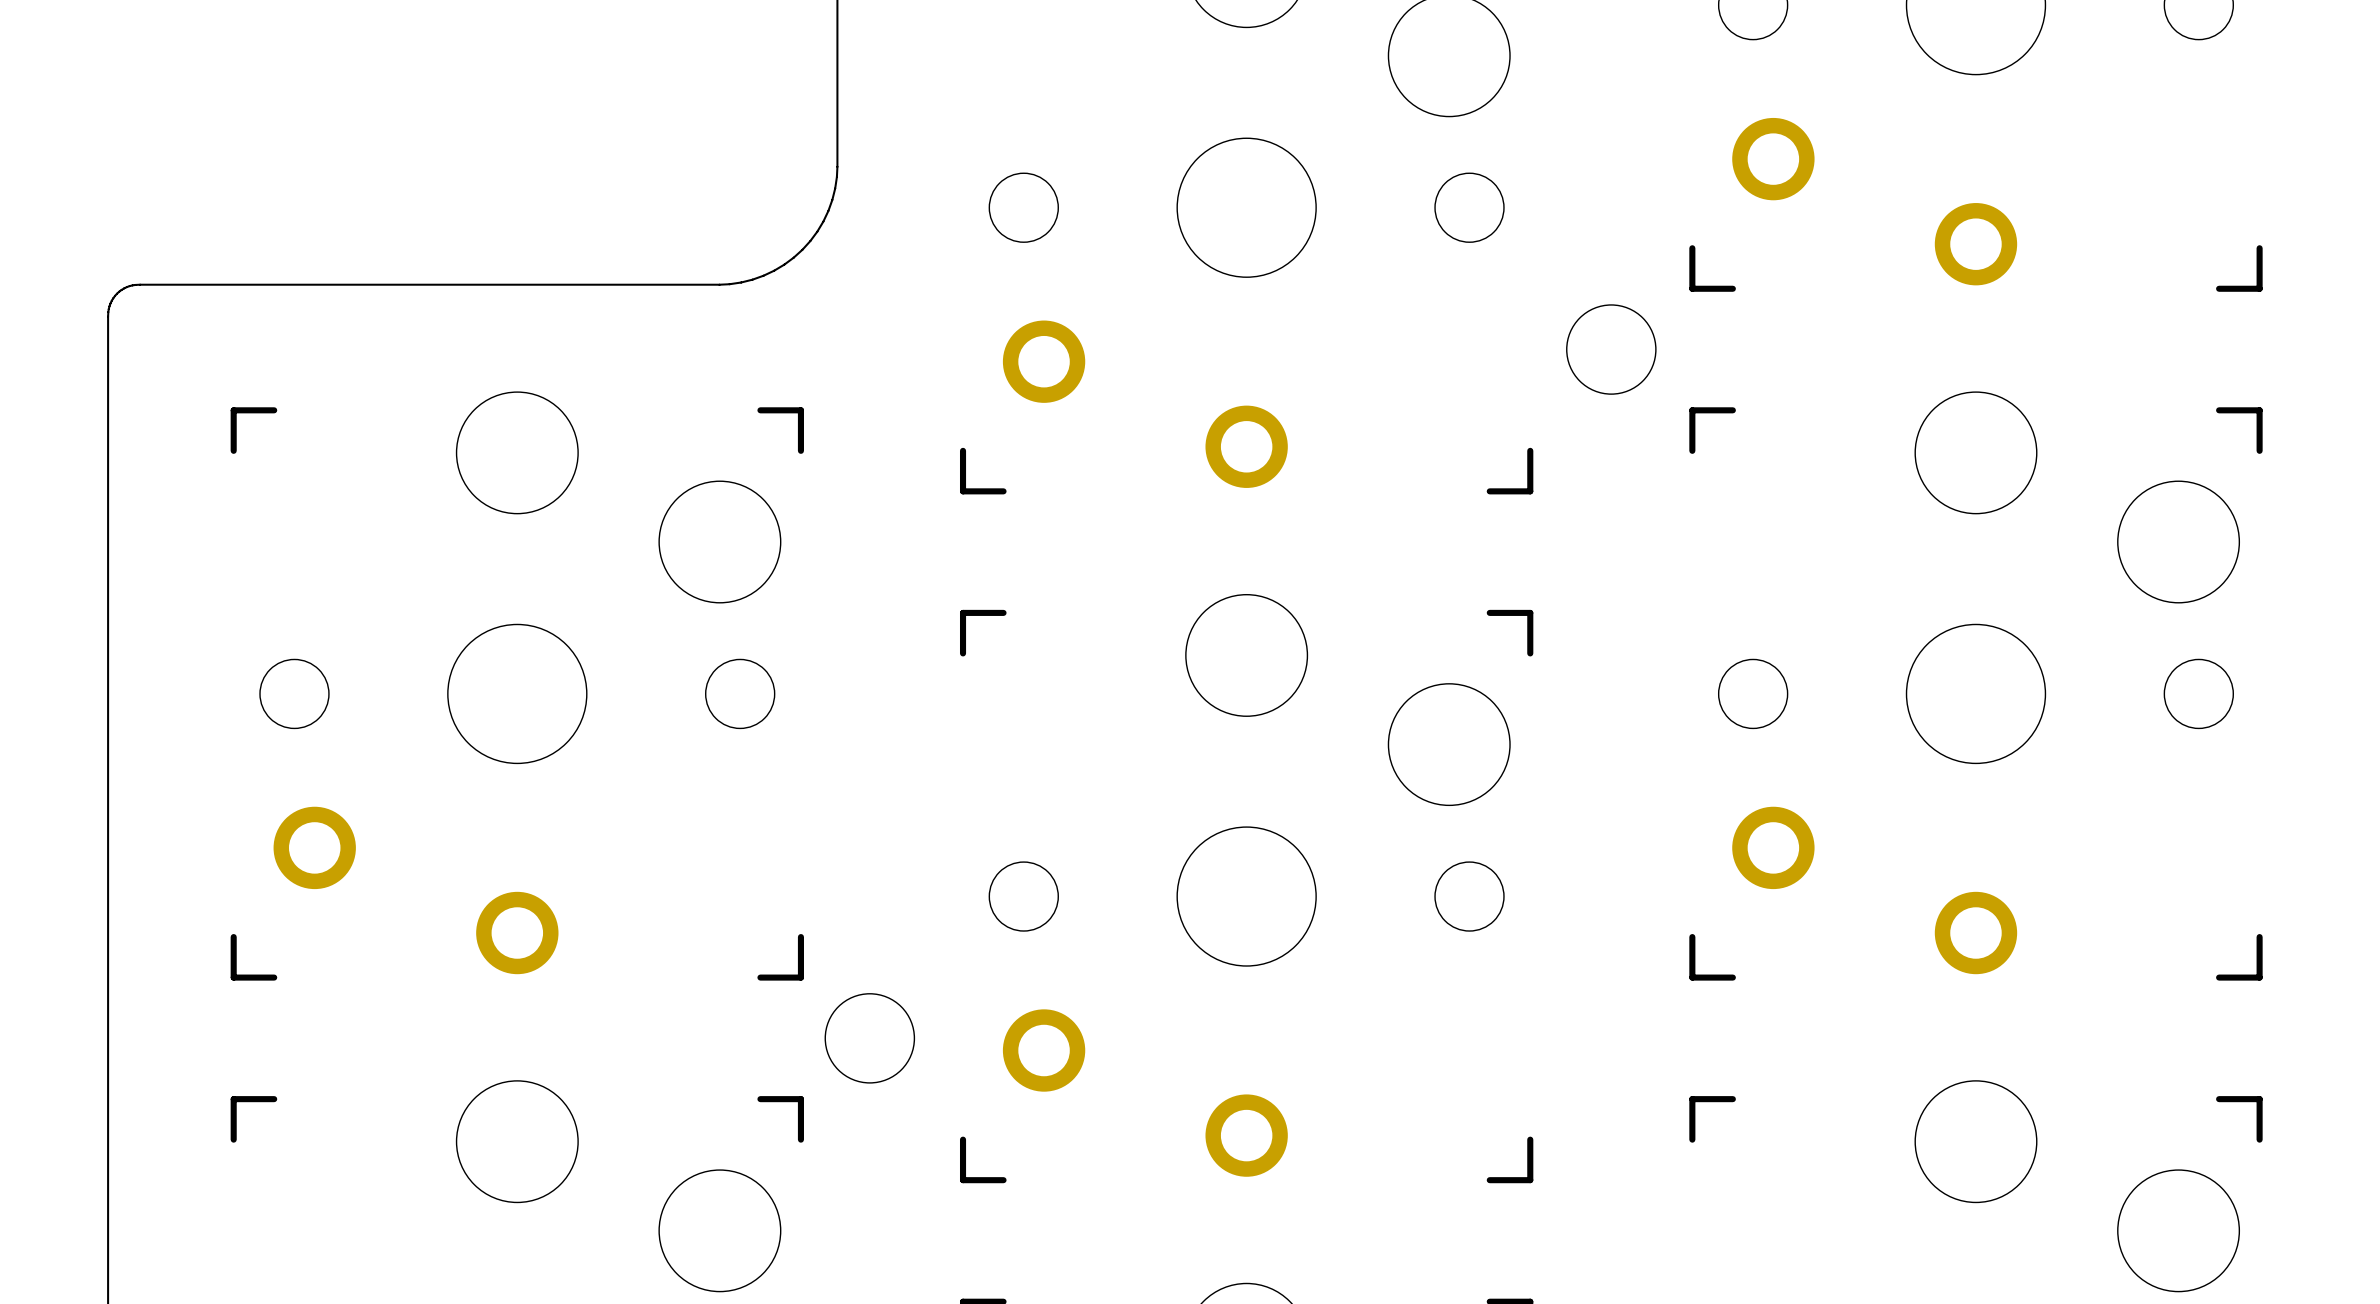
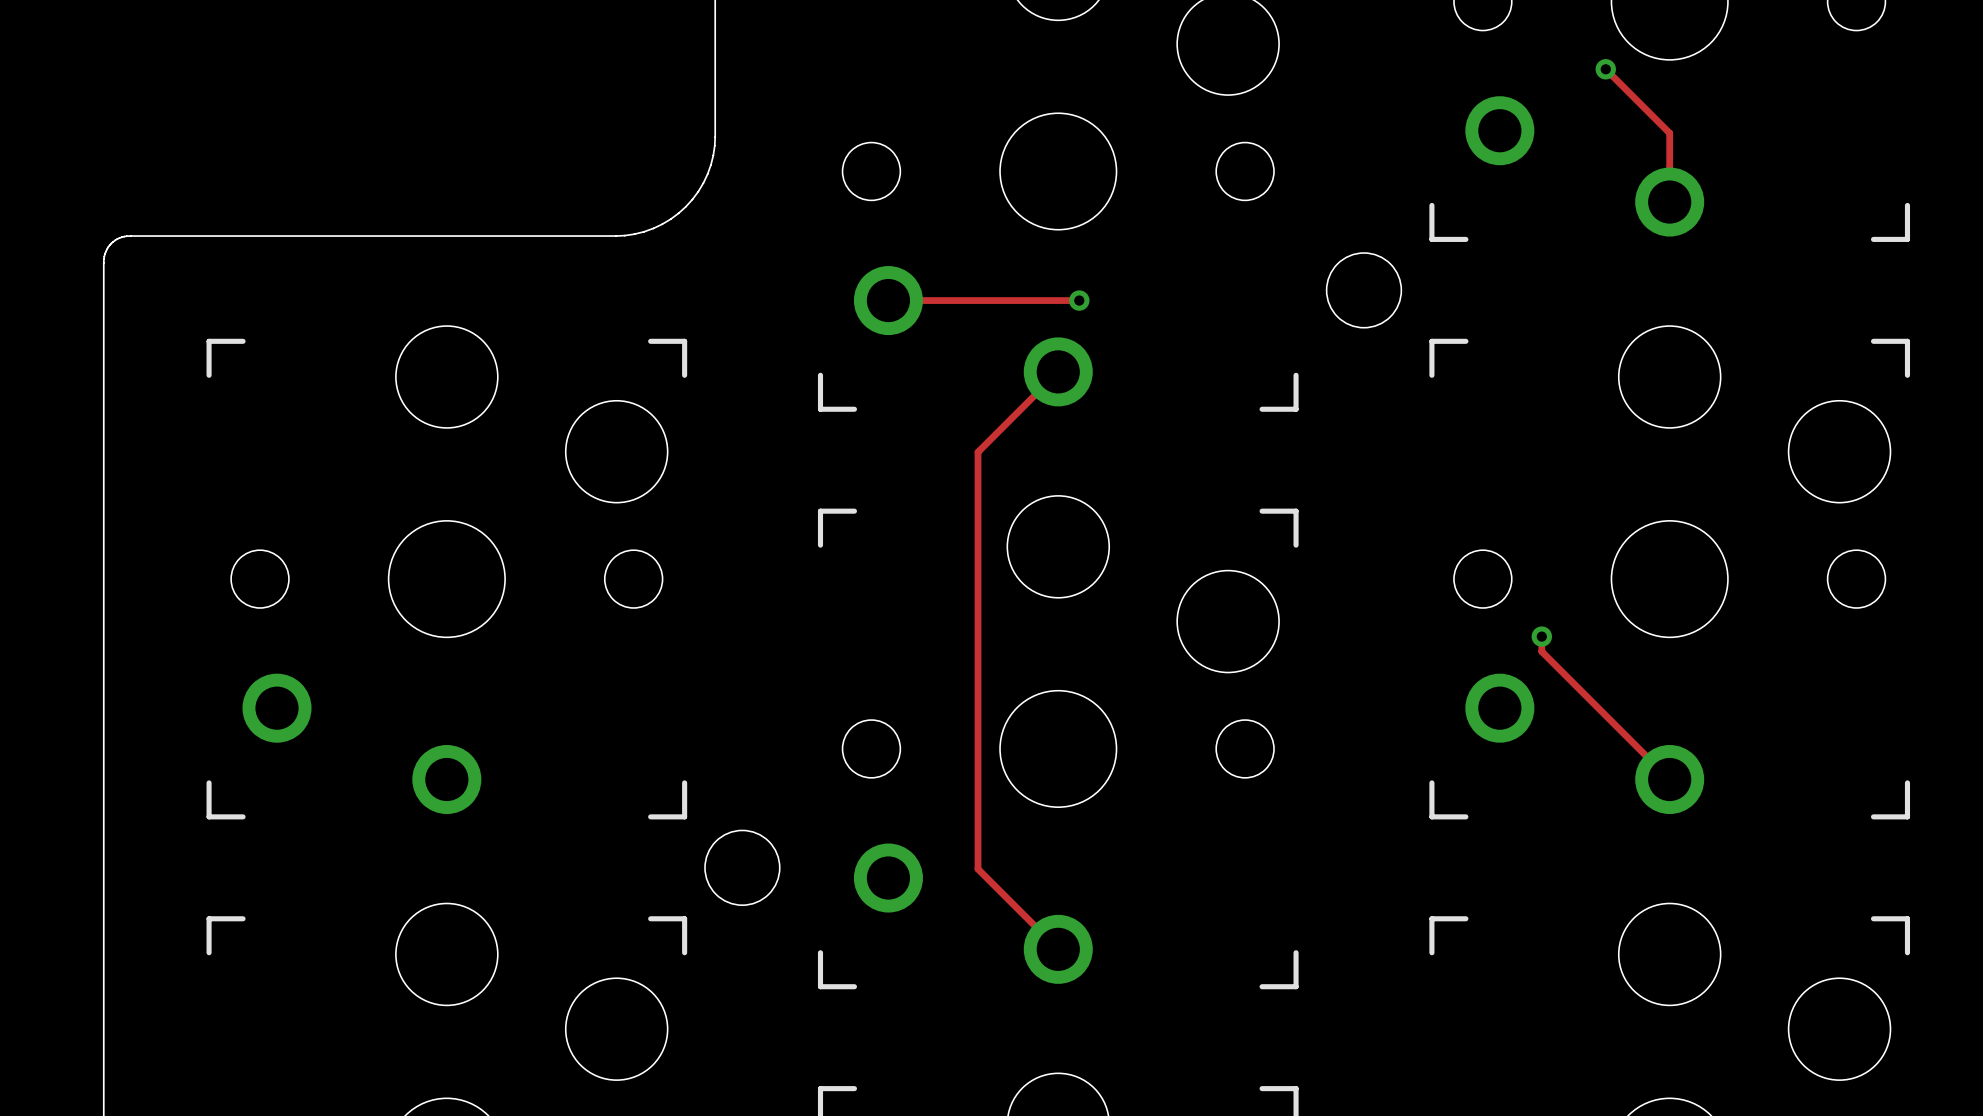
track: none -> (1605, 69) (1669, 133) (1669, 202)
via: none -> (1605, 69)
track: none -> (888, 300) (1079, 300)
via: none -> (1079, 300)
track: none -> (1058, 371) (978, 452) (978, 869) (1058, 949)
track: none -> (1541, 636) (1541, 651) (1669, 779)
via: none -> (1541, 636)

